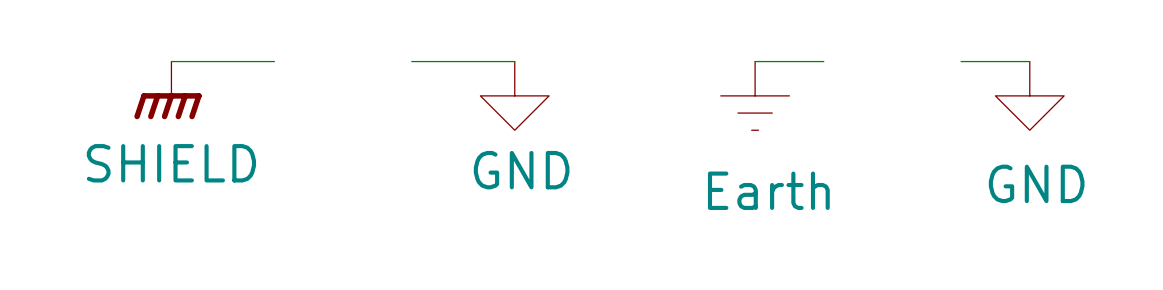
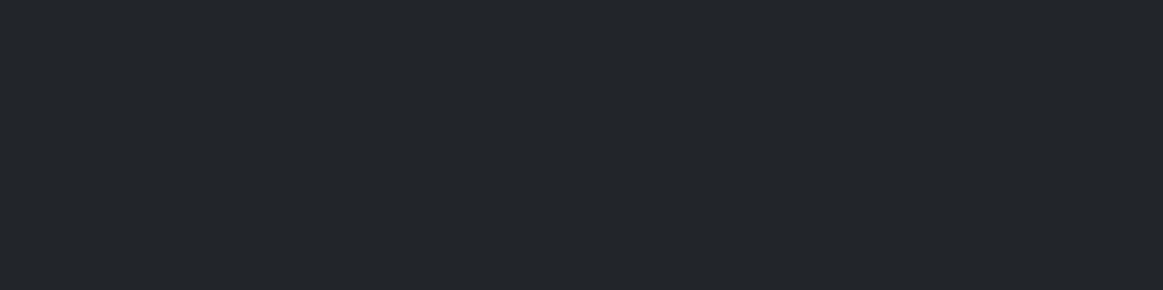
wire: (171, 61) (274, 61) -> none
wire: (411, 61) (514, 61) -> none
wire: (755, 61) (823, 61) -> none
wire: (961, 61) (1029, 61) -> none
power symbol: SHIELD (167, 90) -> none
power symbol: GND (514, 95) -> none
power symbol: Earth (755, 95) -> none
power symbol: GND (1029, 95) -> none

